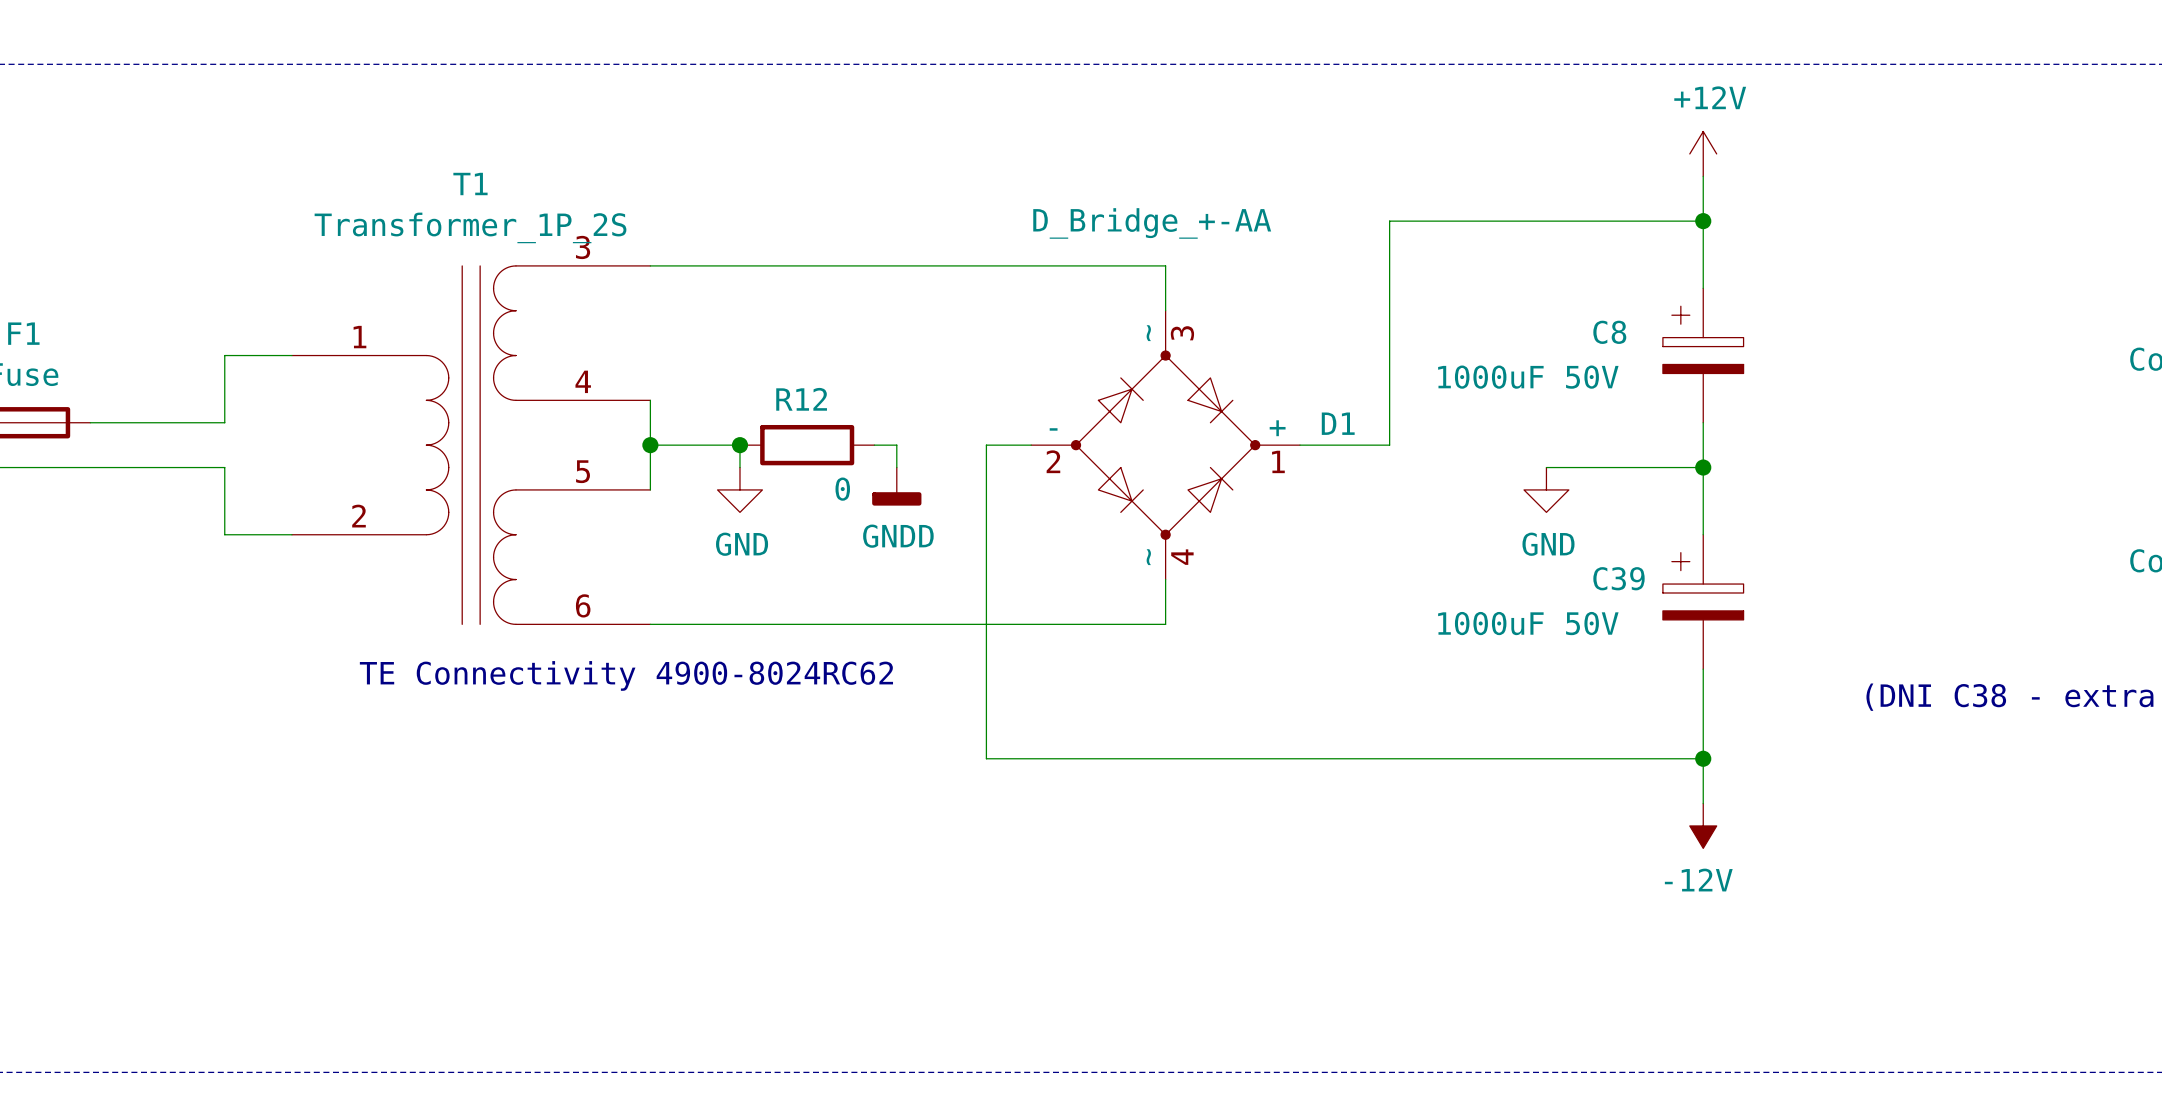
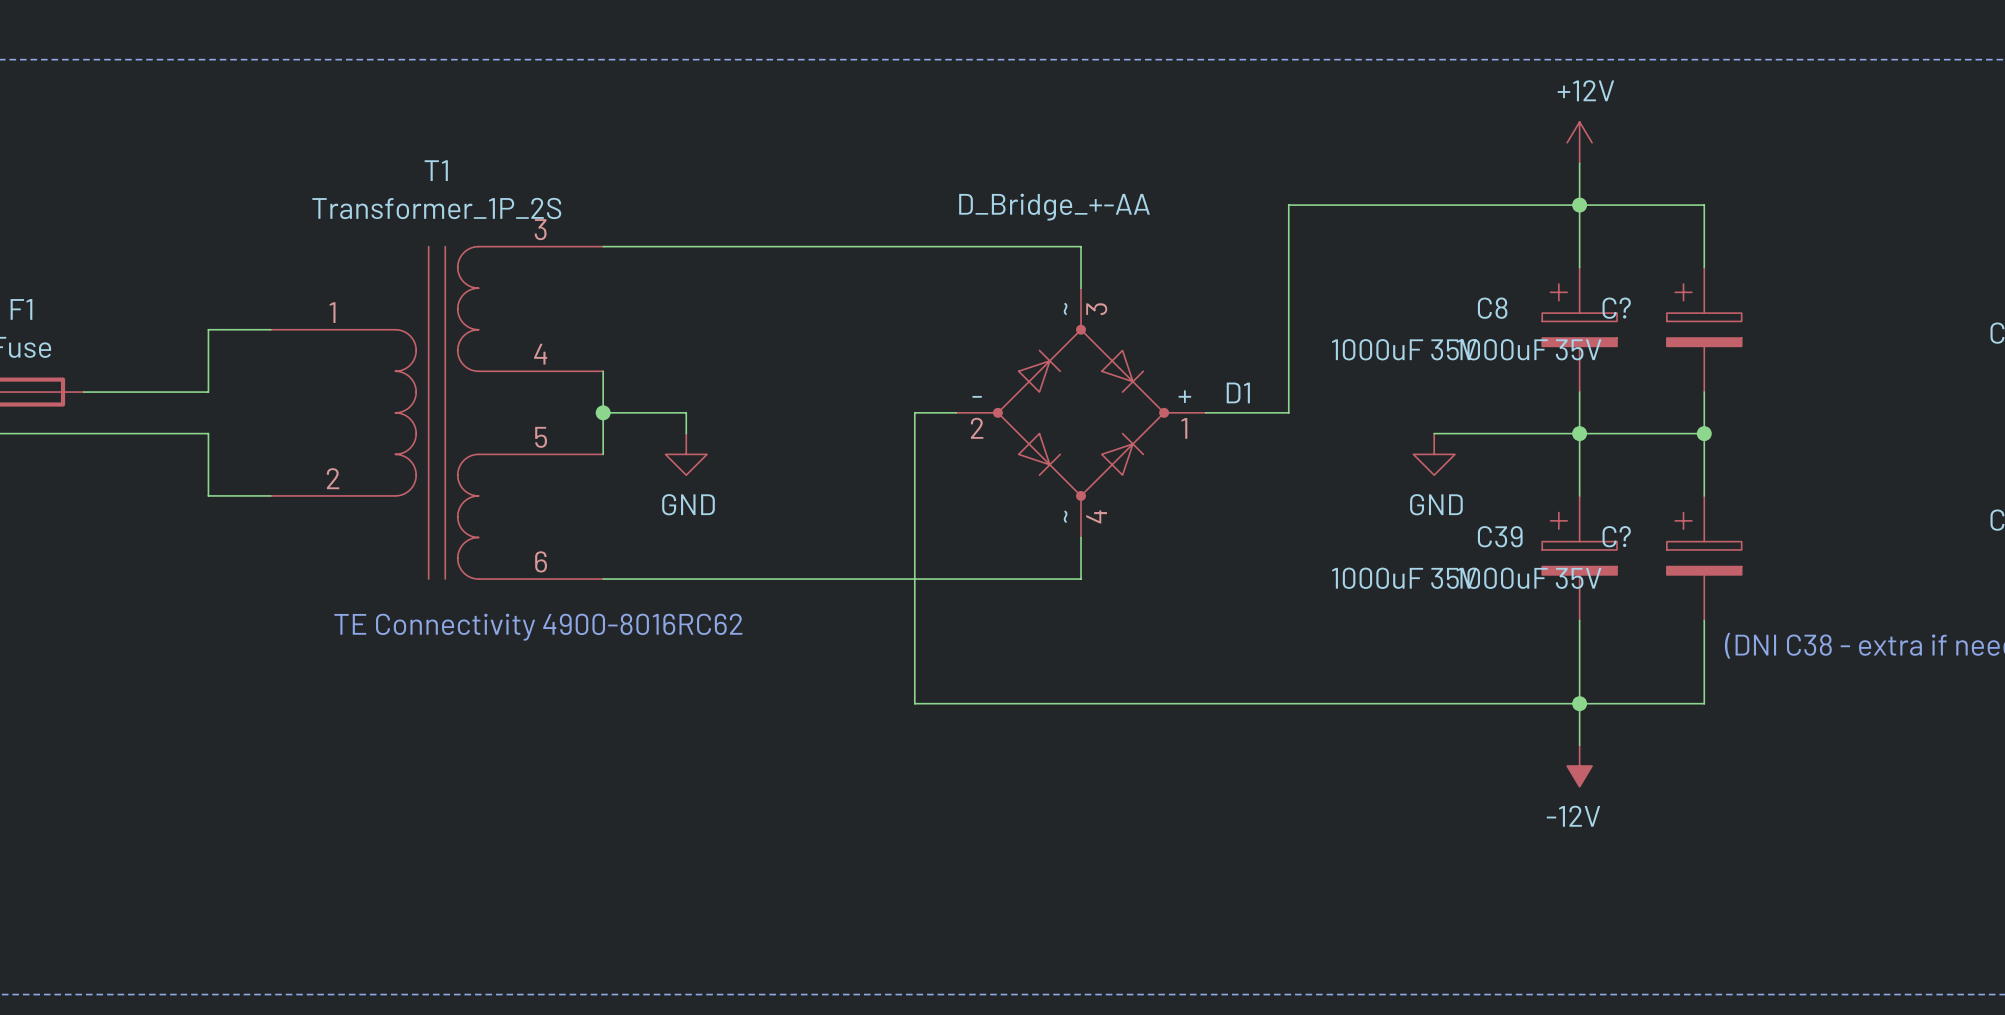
wire: none -> (1579, 205) (1704, 205) (1704, 267)
C?: none -> 1000uF 35V (1704, 329)
C8 value: 1000uF 50V (1528, 377) -> 1000uF 35V (1404, 349)
wire: none -> (1704, 392) (1704, 495)
junction: (739, 445) -> none
R12: 0 (807, 445) -> none
wire: (874, 445) (896, 445) (896, 467) -> none
wire: none -> (1579, 433) (1704, 433)
junction: none -> (1704, 433)
power symbol: GNDD (896, 486) -> none
C?: none -> 1000uF 35V (1704, 558)
C39 value: 1000uF 50V (1528, 623) -> 1000uF 35V (1404, 578)
wire: none -> (1704, 620) (1704, 703) (1579, 703)
text: TE Connectivity 4900-8024RC62 (626, 675) -> TE Connectivity 4900-8016RC62 (538, 627)

